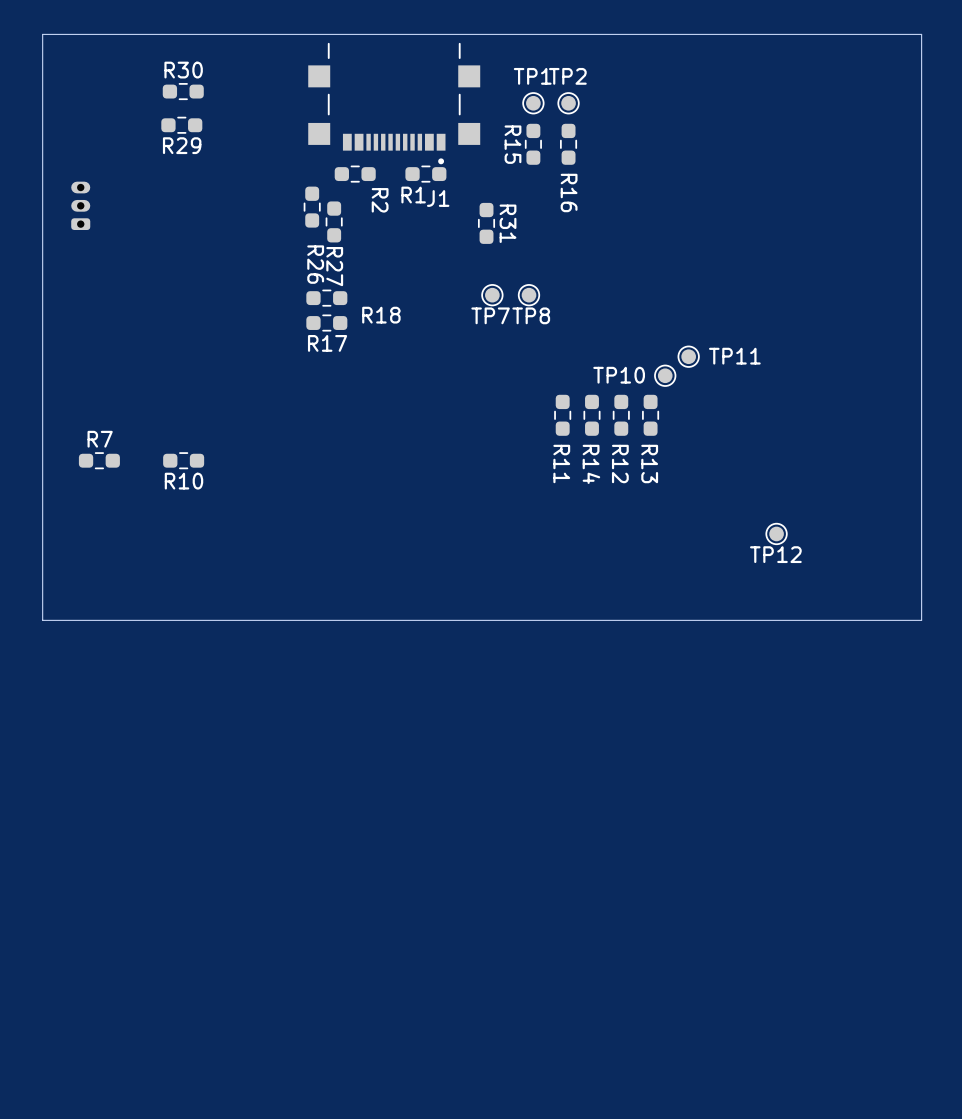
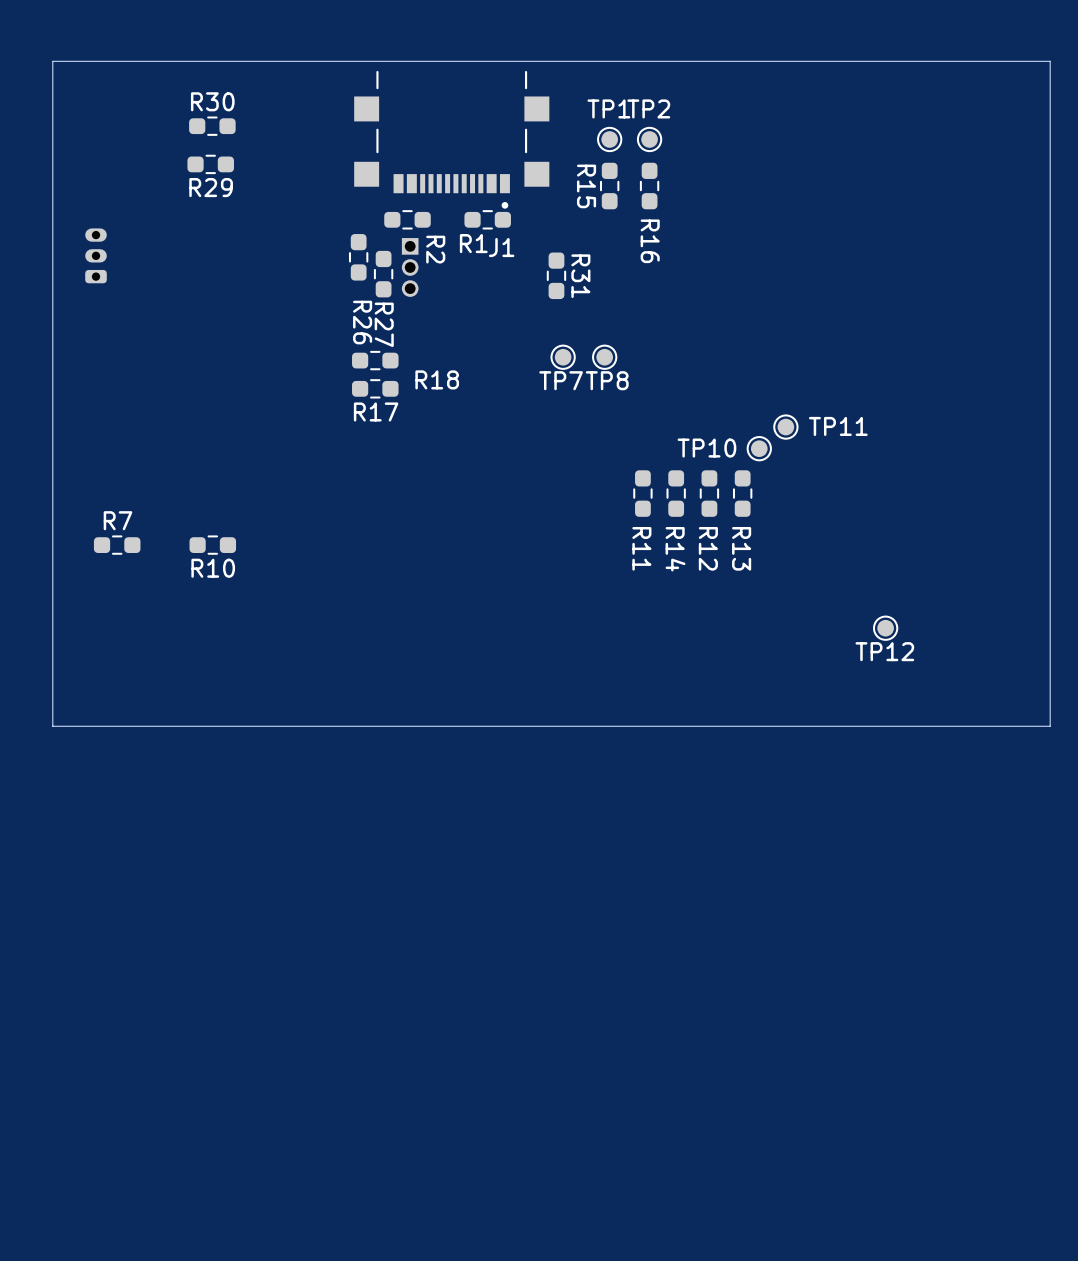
part: none -> (410, 267)

